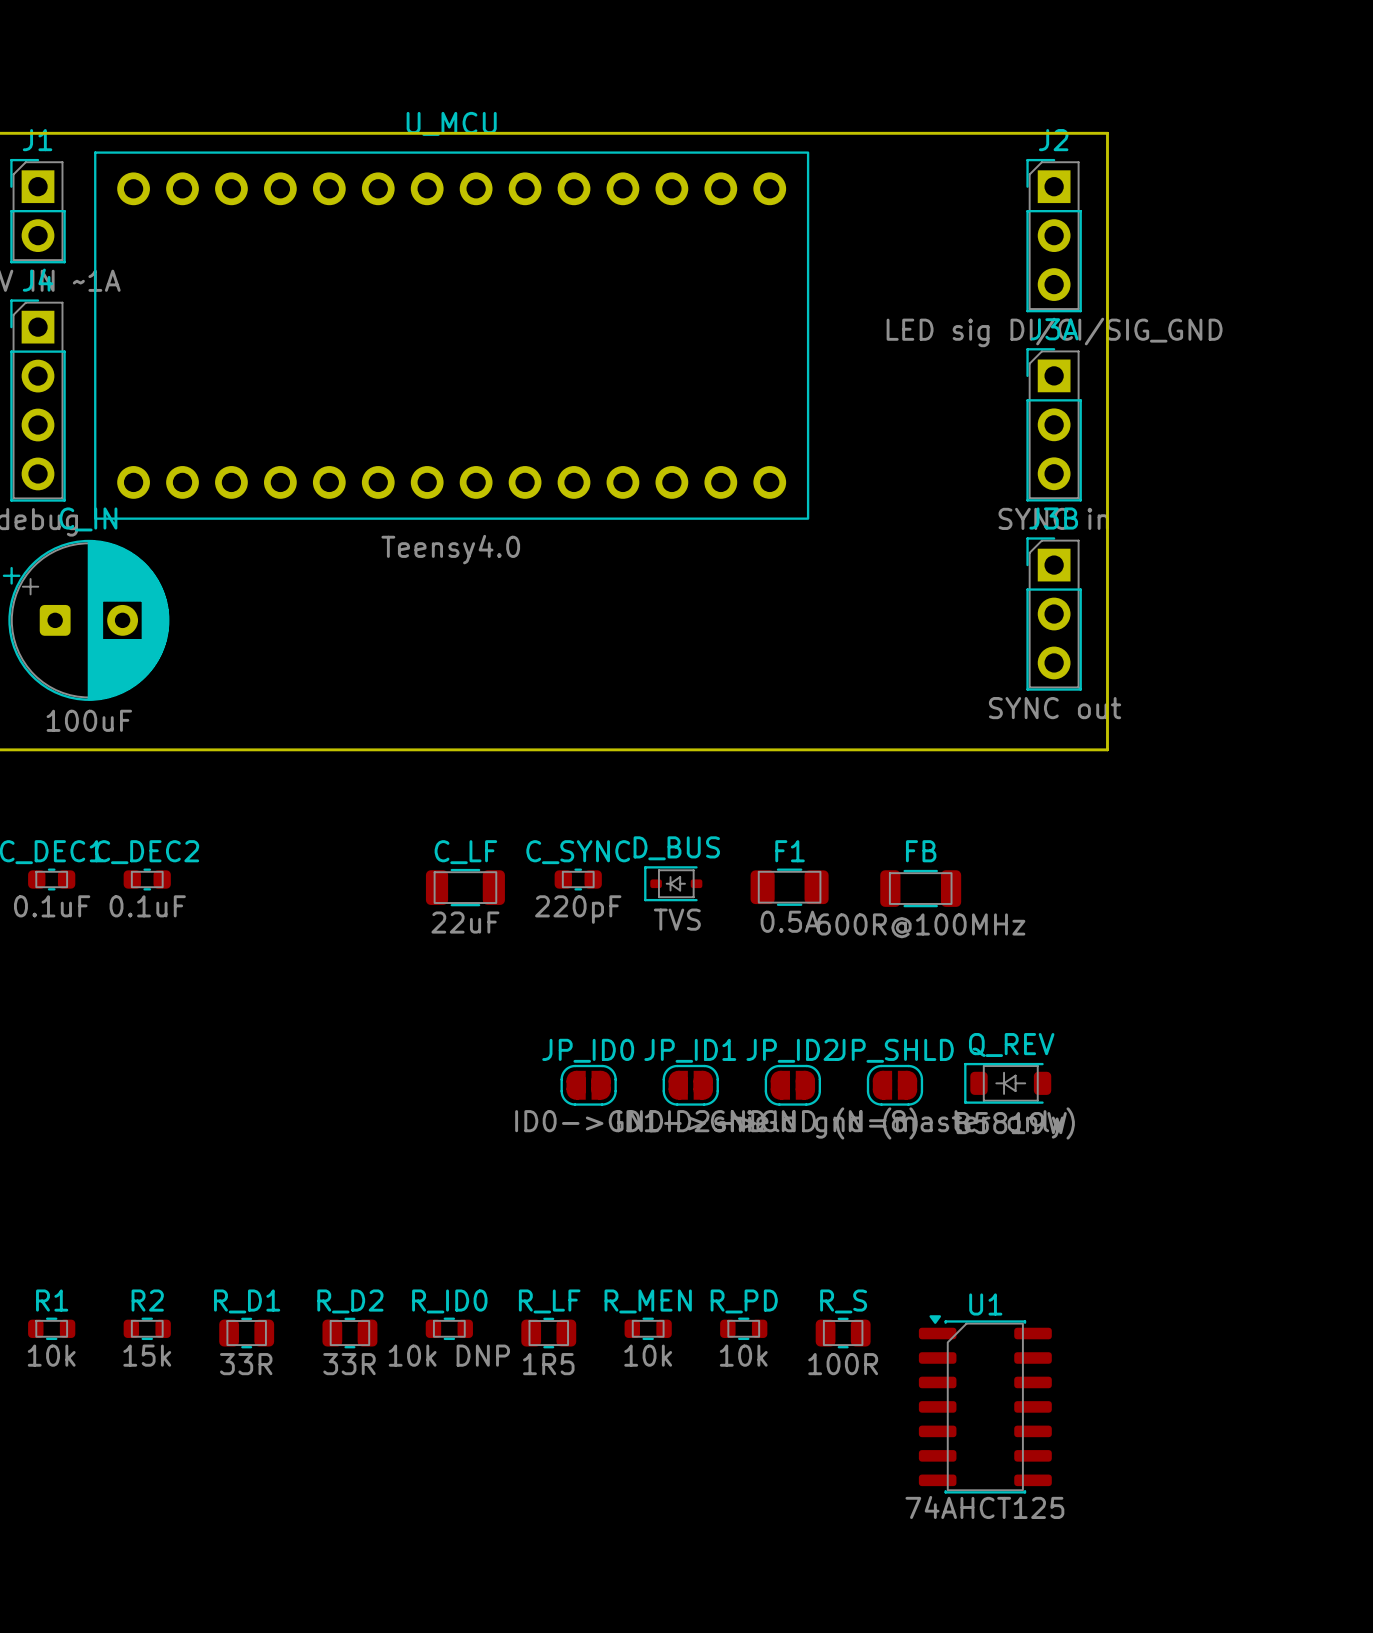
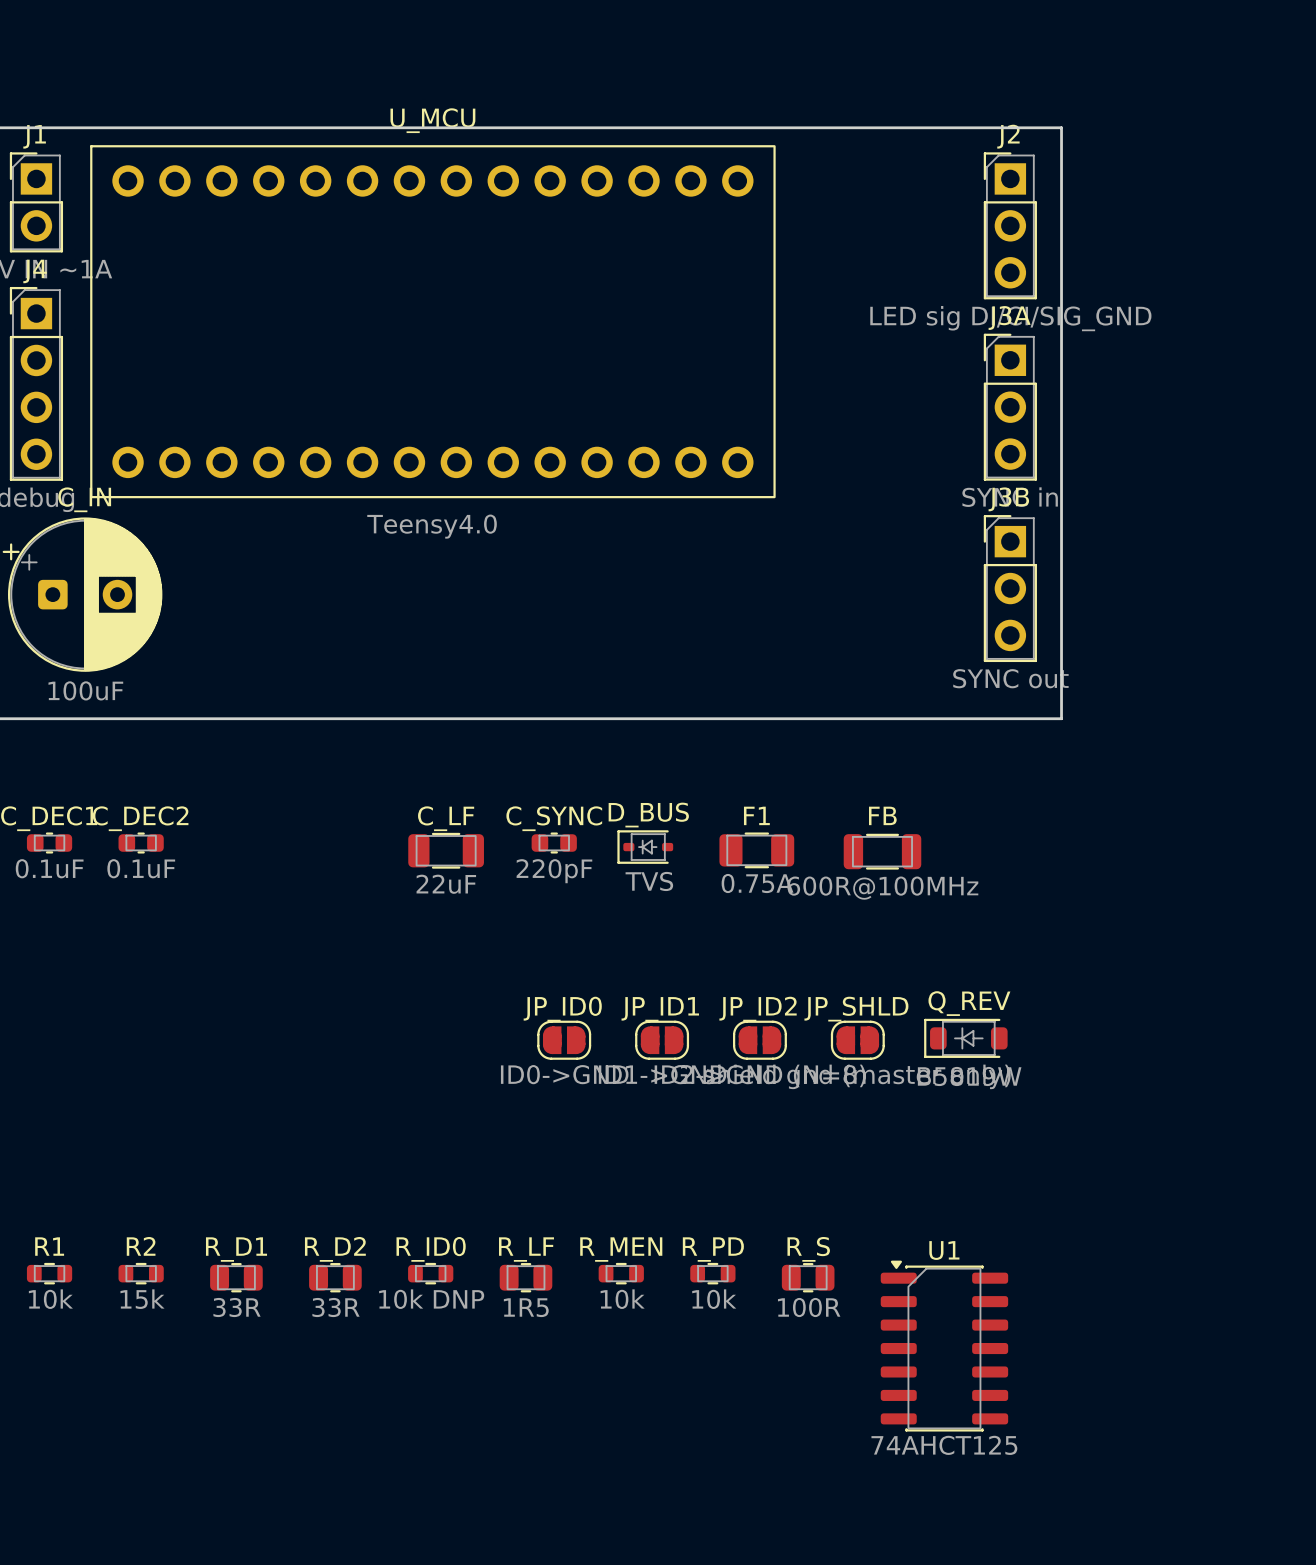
F1 value: 0.5A (790, 921) -> 0.75A (757, 883)

